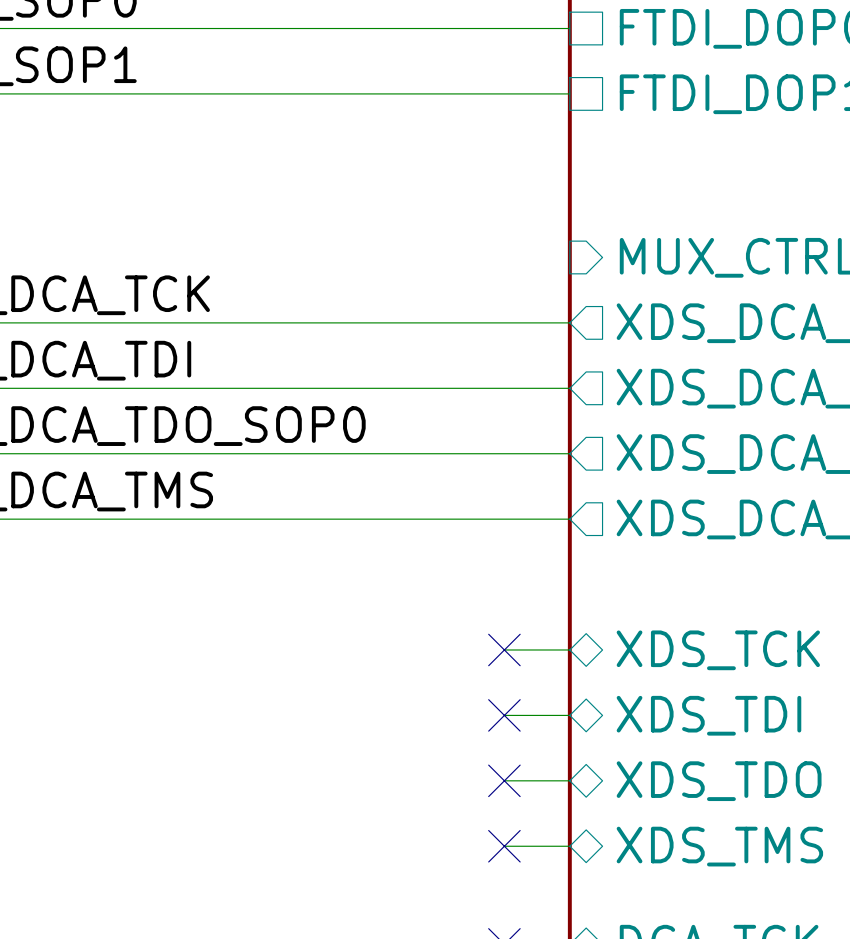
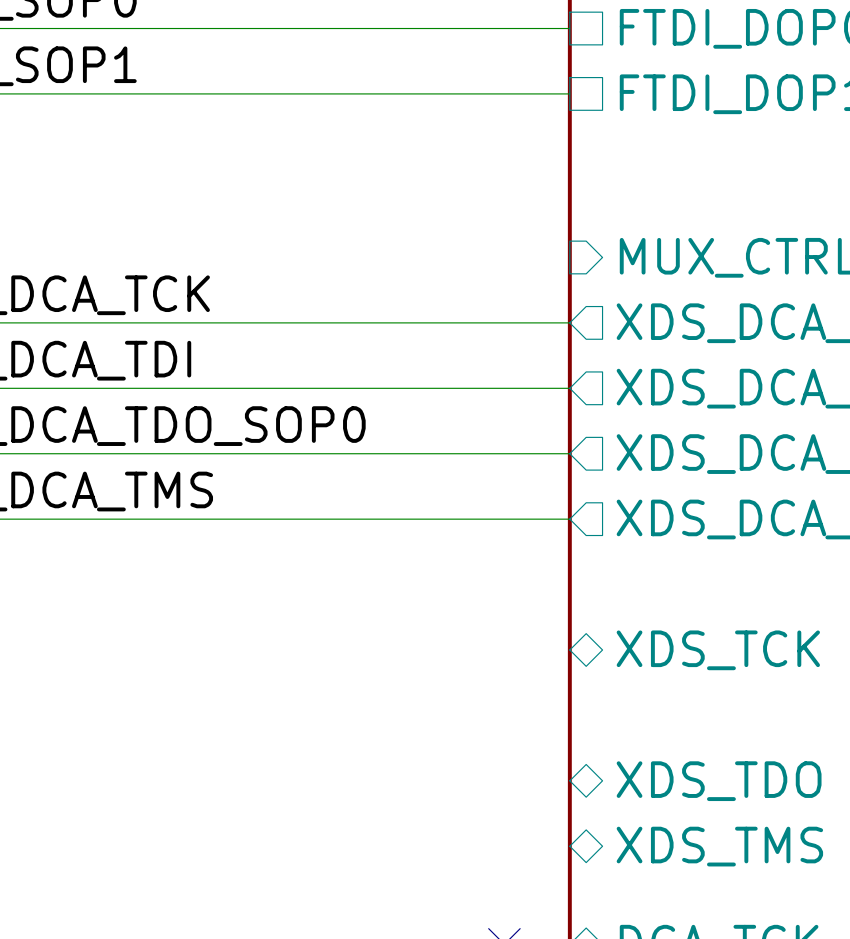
wire: (504, 649) (569, 649) -> none
no-connect mark: (504, 649) -> none
wire: (504, 715) (569, 715) -> none
no-connect mark: (504, 715) -> none
sheet pin: XDS_TDI (708, 715) -> none
wire: (504, 780) (569, 780) -> none
no-connect mark: (504, 780) -> none
wire: (504, 846) (569, 846) -> none
no-connect mark: (504, 846) -> none

